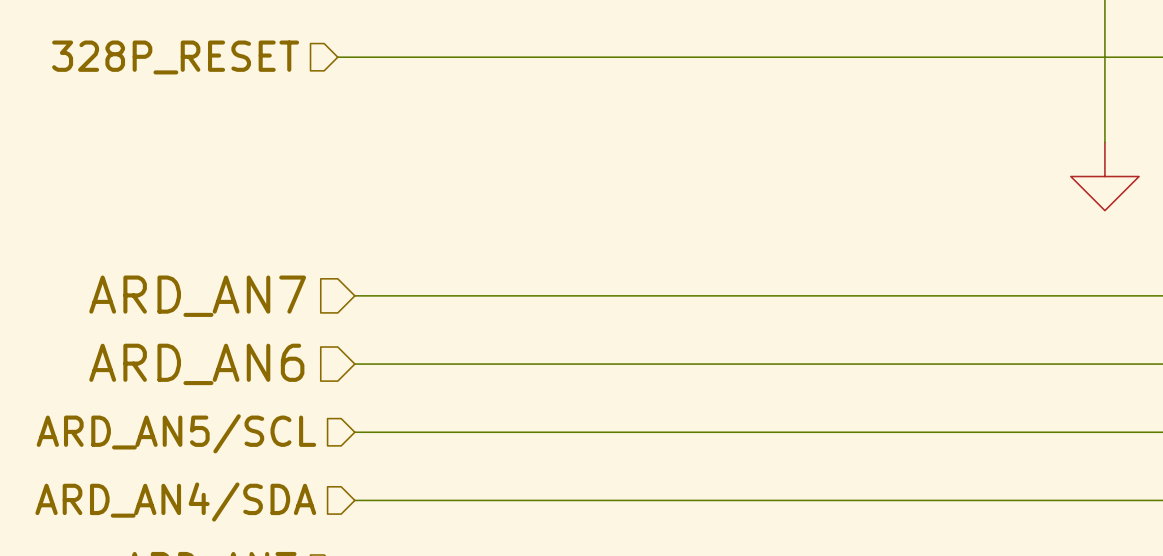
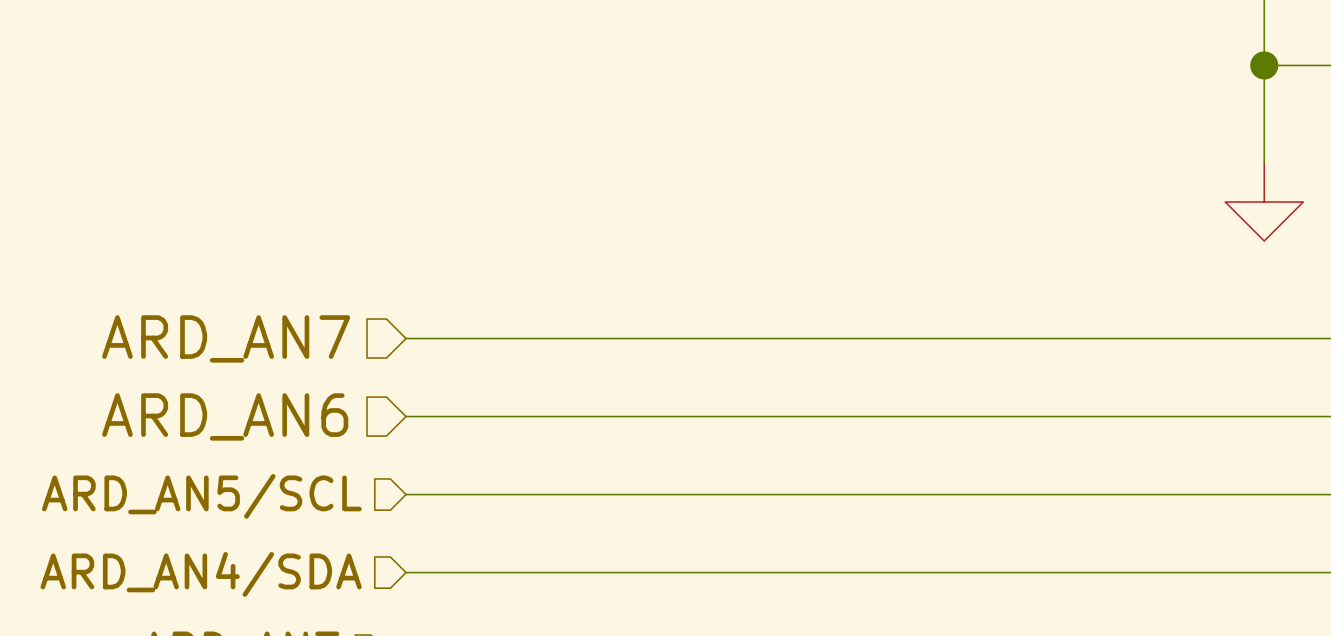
hierarchical label: 328P_RESET (175, 57) -> none
wire: (337, 57) (1104, 57) -> none
junction: none -> (1264, 65)

